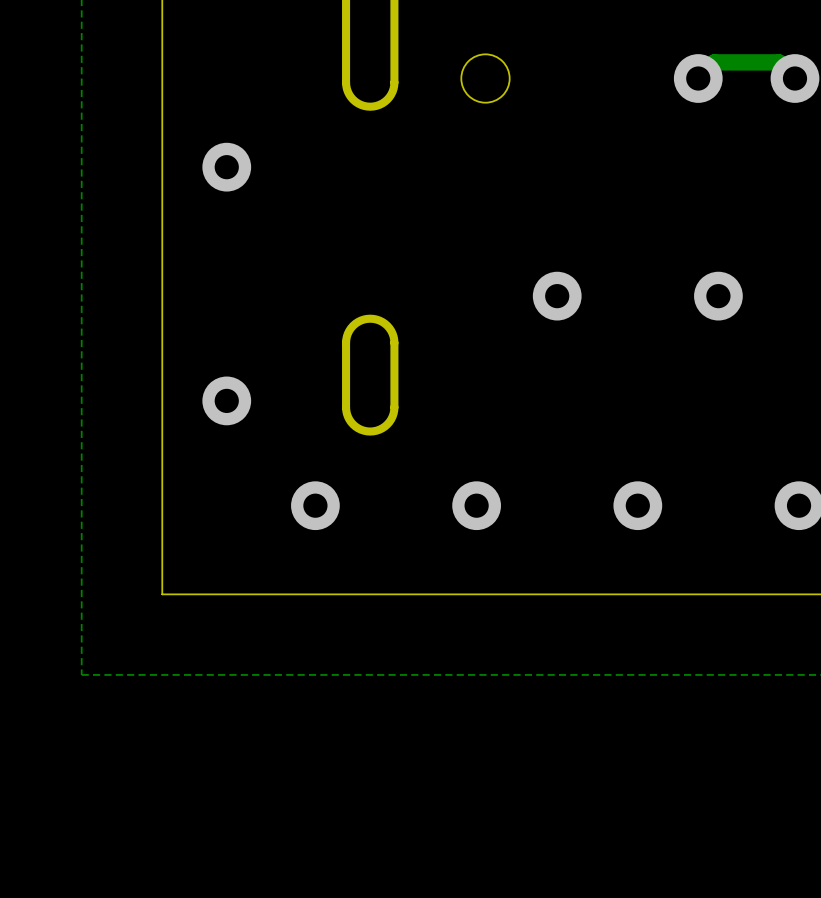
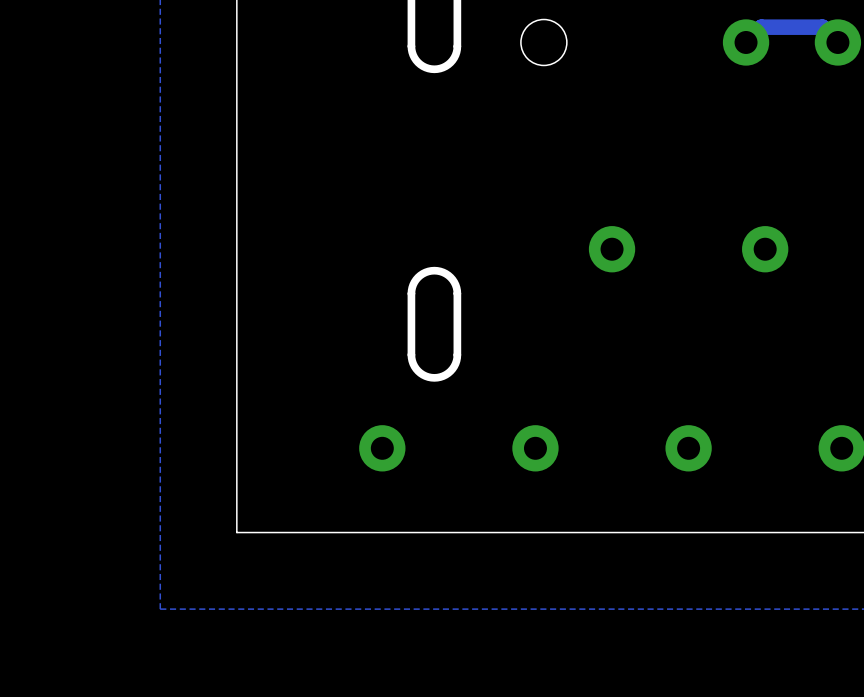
via: (226, 167) -> none
via: (226, 400) -> none

